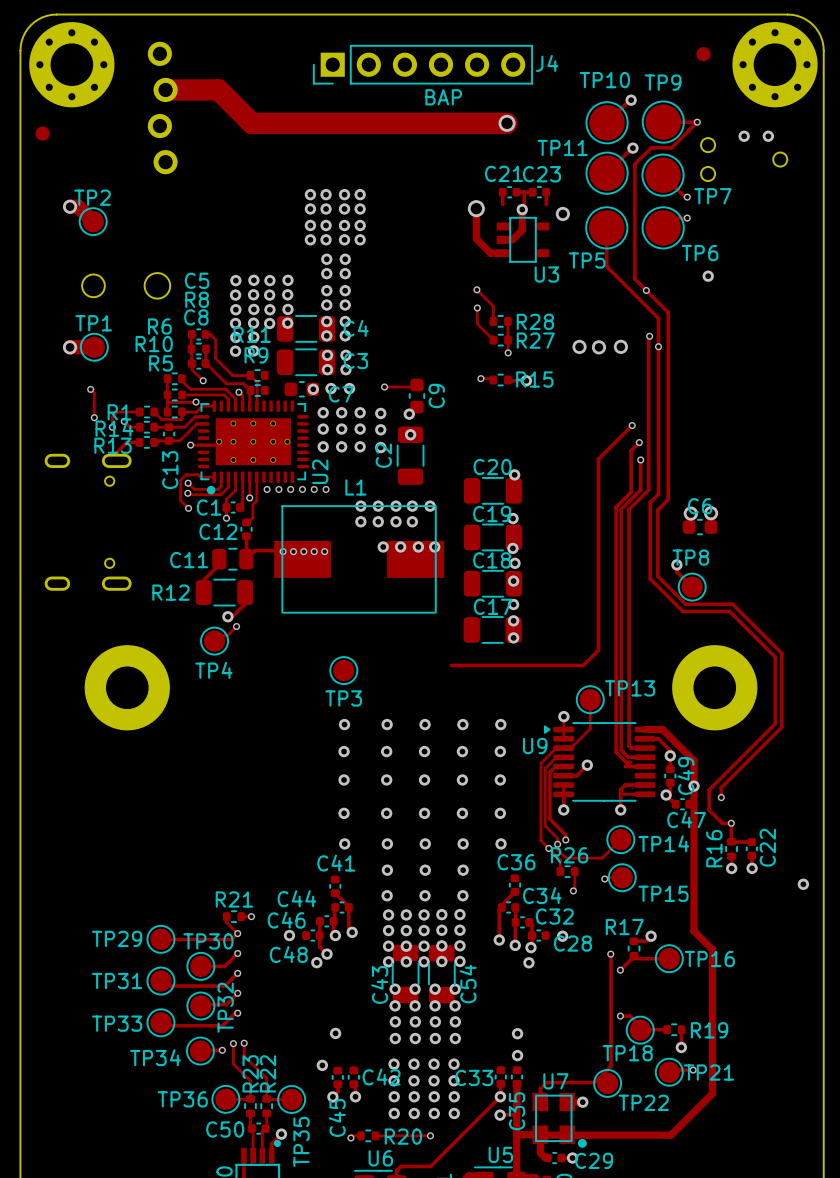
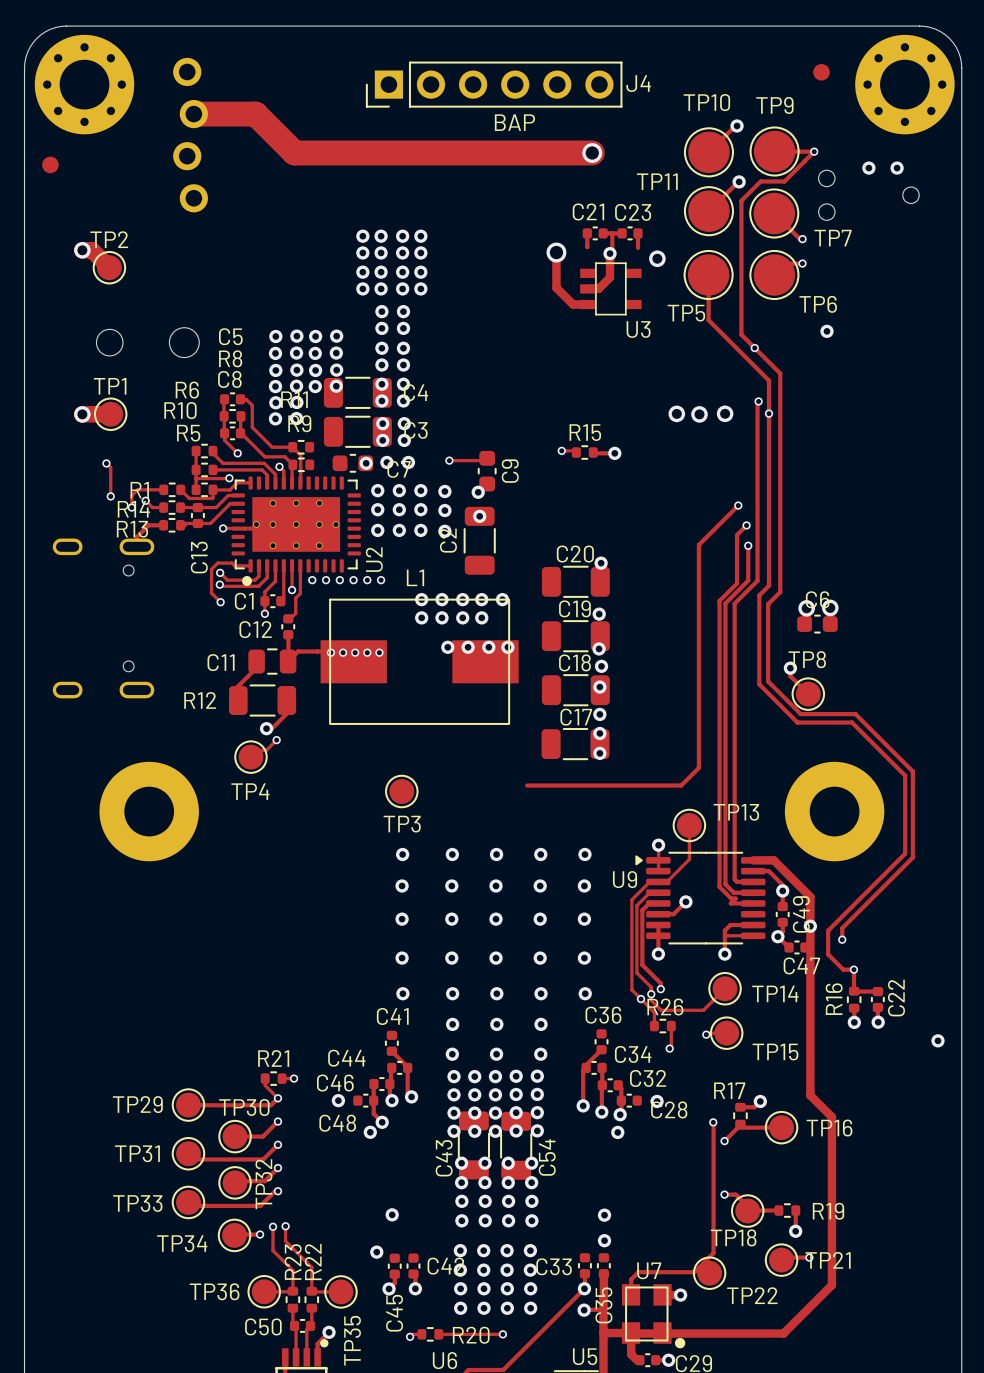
track: (476, 289) (493, 306) (493, 321) -> none
via: (476, 289) -> none
track: (477, 308) (477, 323) (493, 340) -> none
via: (477, 308) -> none
R28: (500, 321) -> none
track: (507, 321) (507, 339) -> none
R27: (500, 340) -> none
track: (508, 340) (508, 352) -> none
via: (508, 352) -> none
R15 name position: R15 (534, 379) -> R15 (585, 432)

